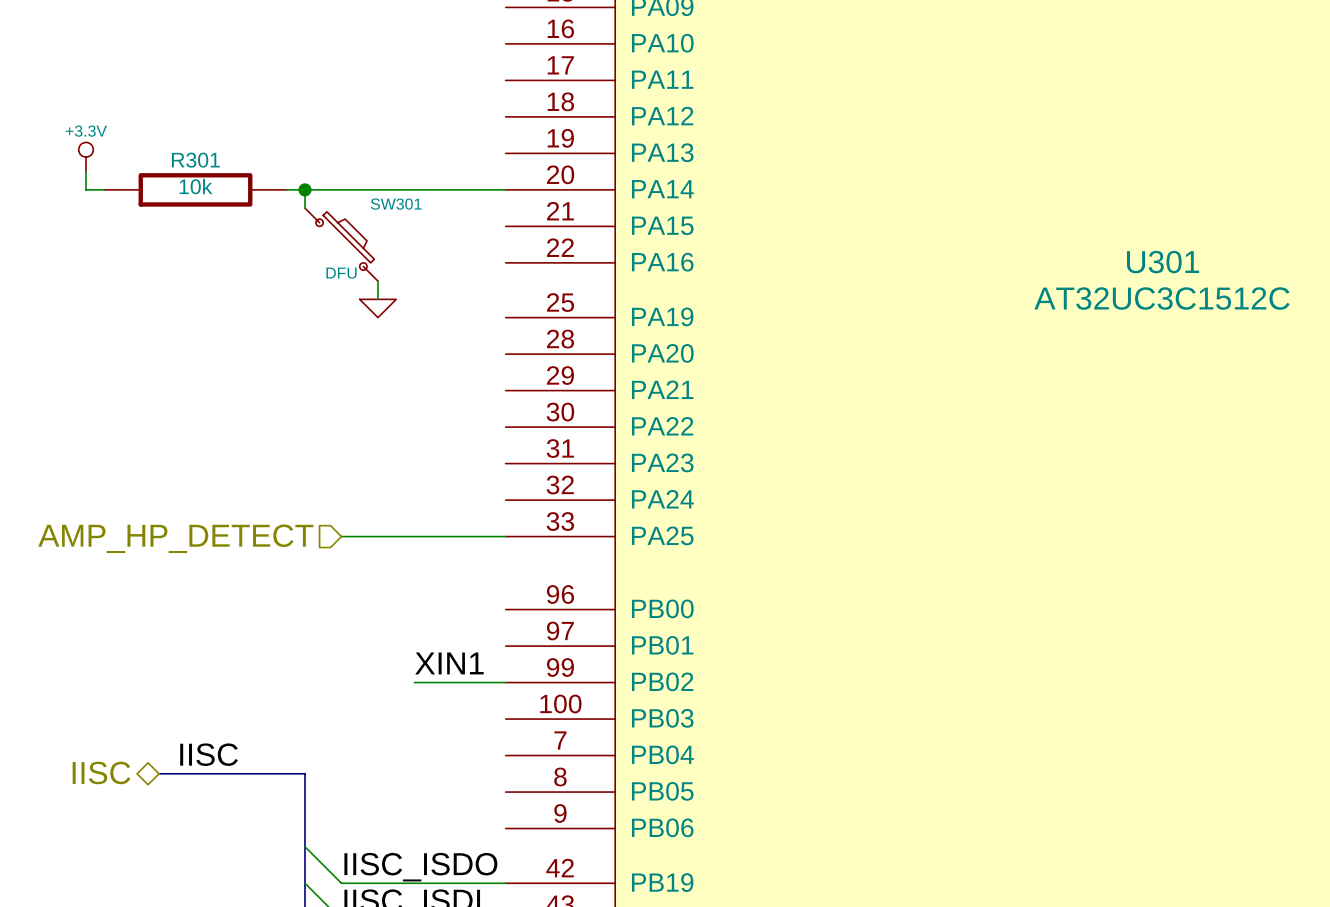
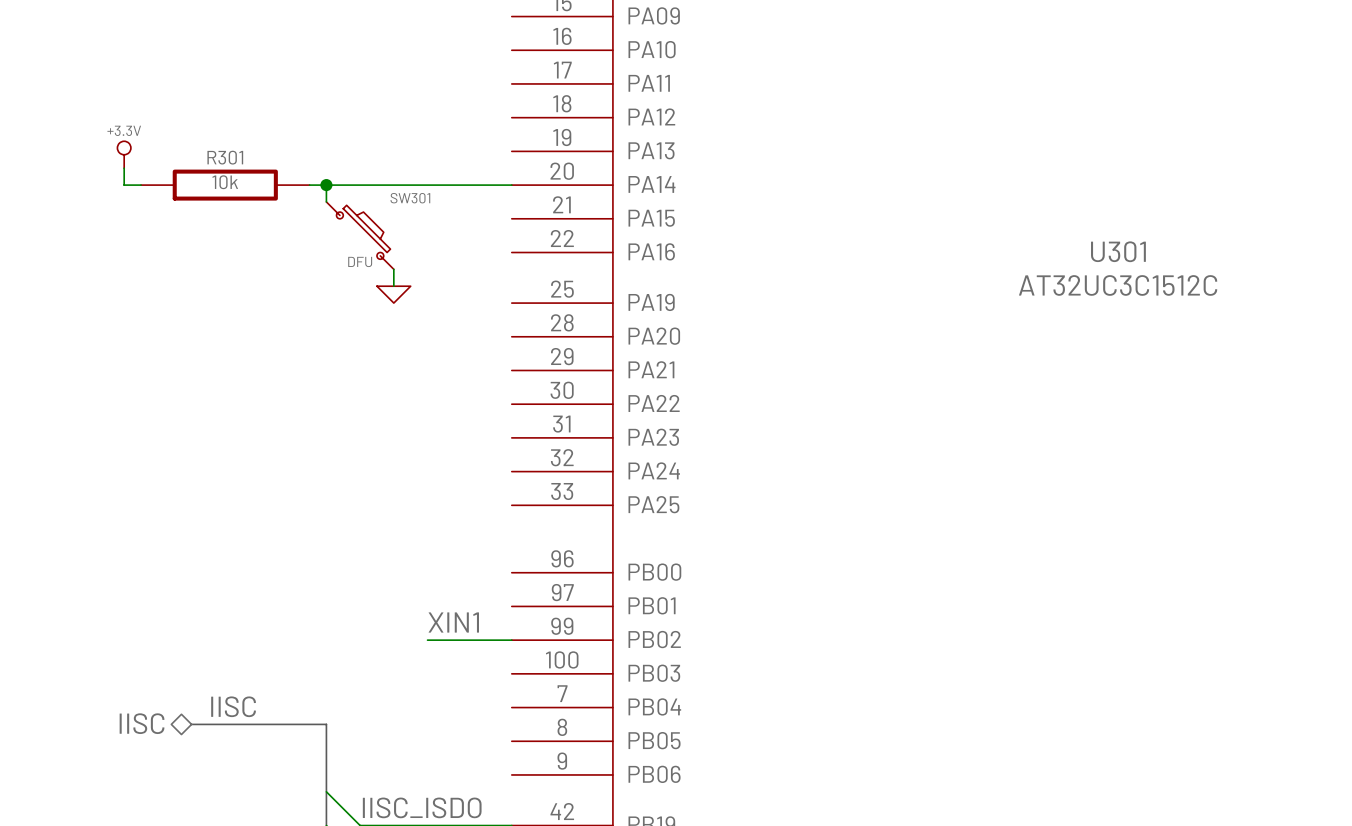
wire: (341, 536) (505, 536) -> none
hierarchical label: AMP_HP_DETECT (175, 538) -> none

